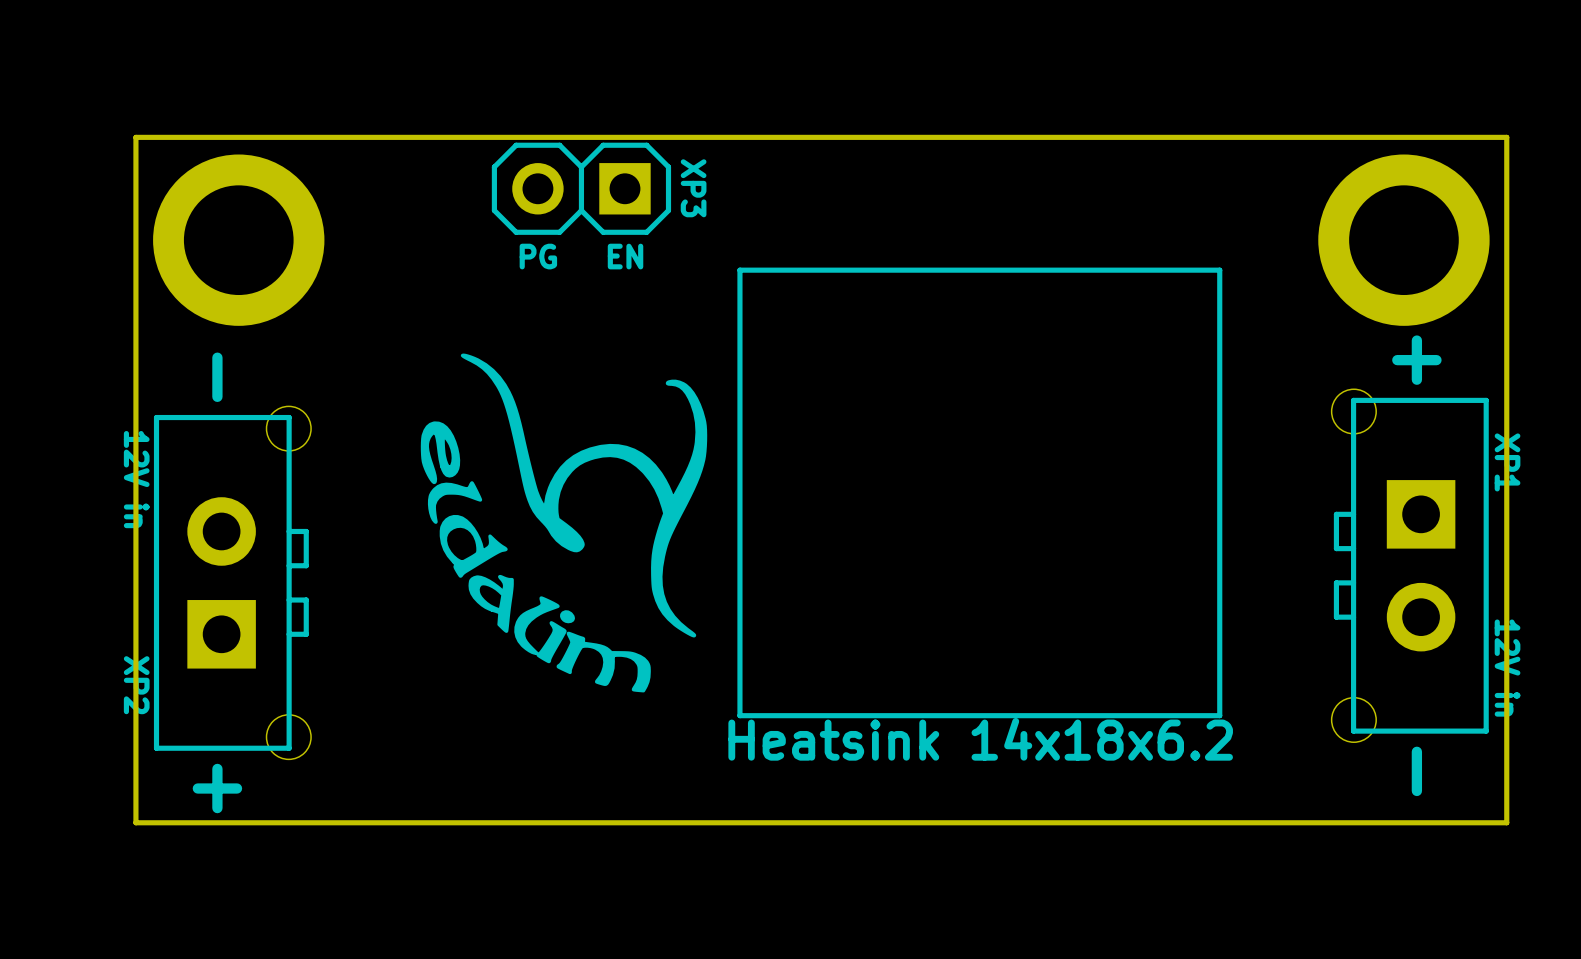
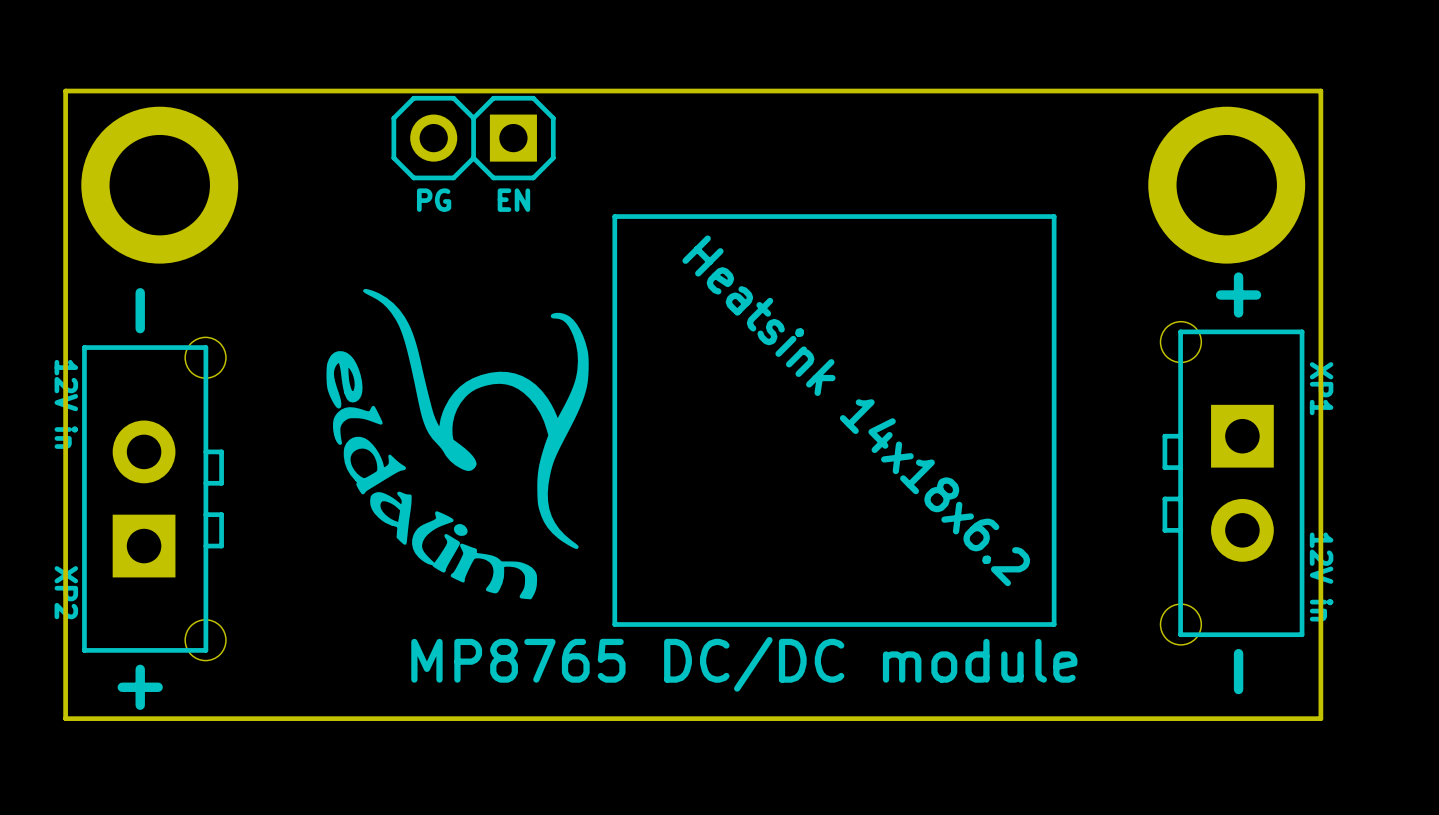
XP3 name: XP3 (693, 188) -> none
drawing shape: [728, 267, 1233, 761] -> [612, 214, 1057, 627]
text: none -> MP8765 DC/DC module (744, 664)

